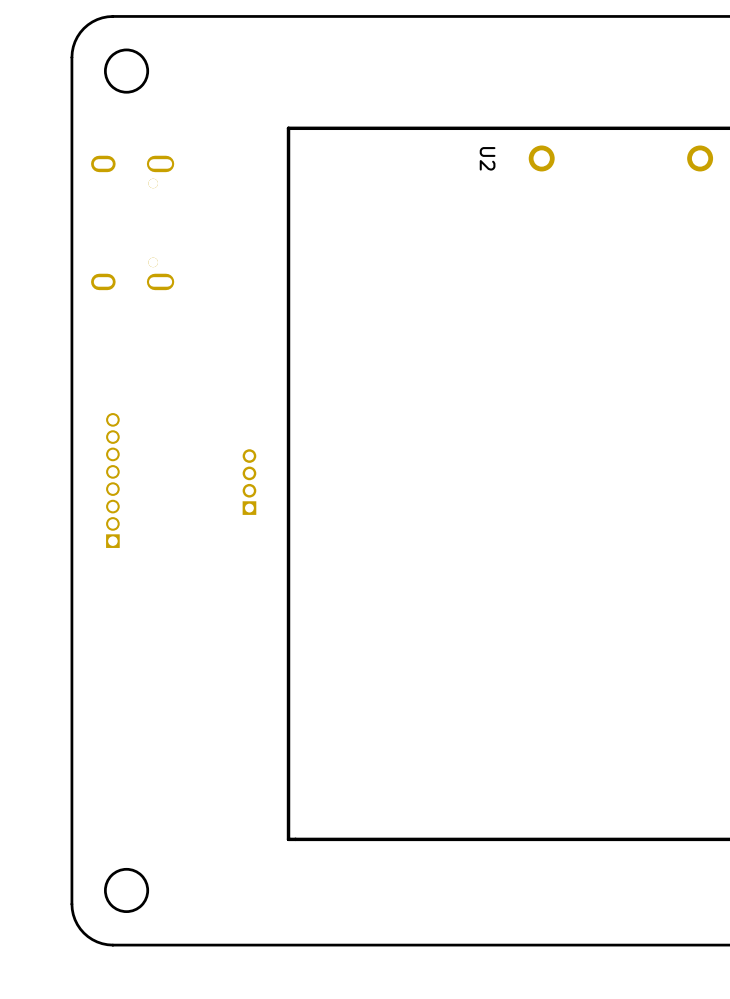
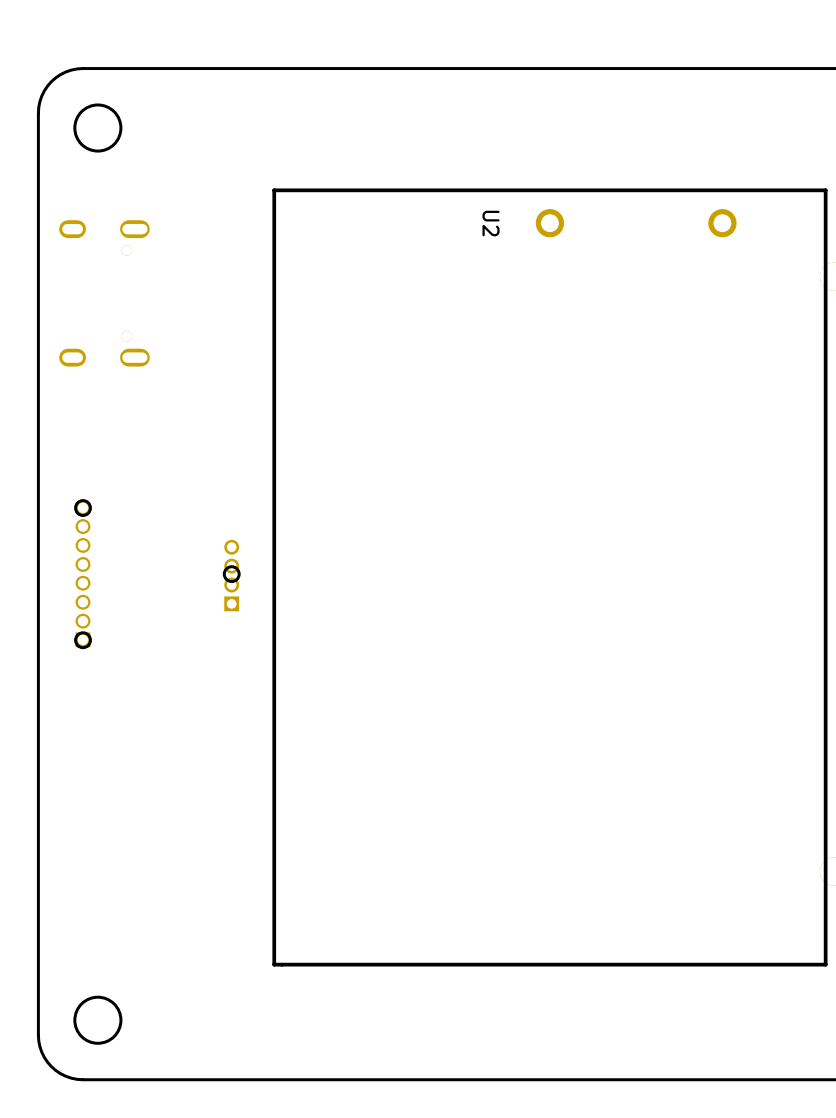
round board edge: none -> [74, 499, 92, 517]
round board edge: none -> [222, 565, 241, 584]
round board edge: none -> [74, 631, 92, 650]

